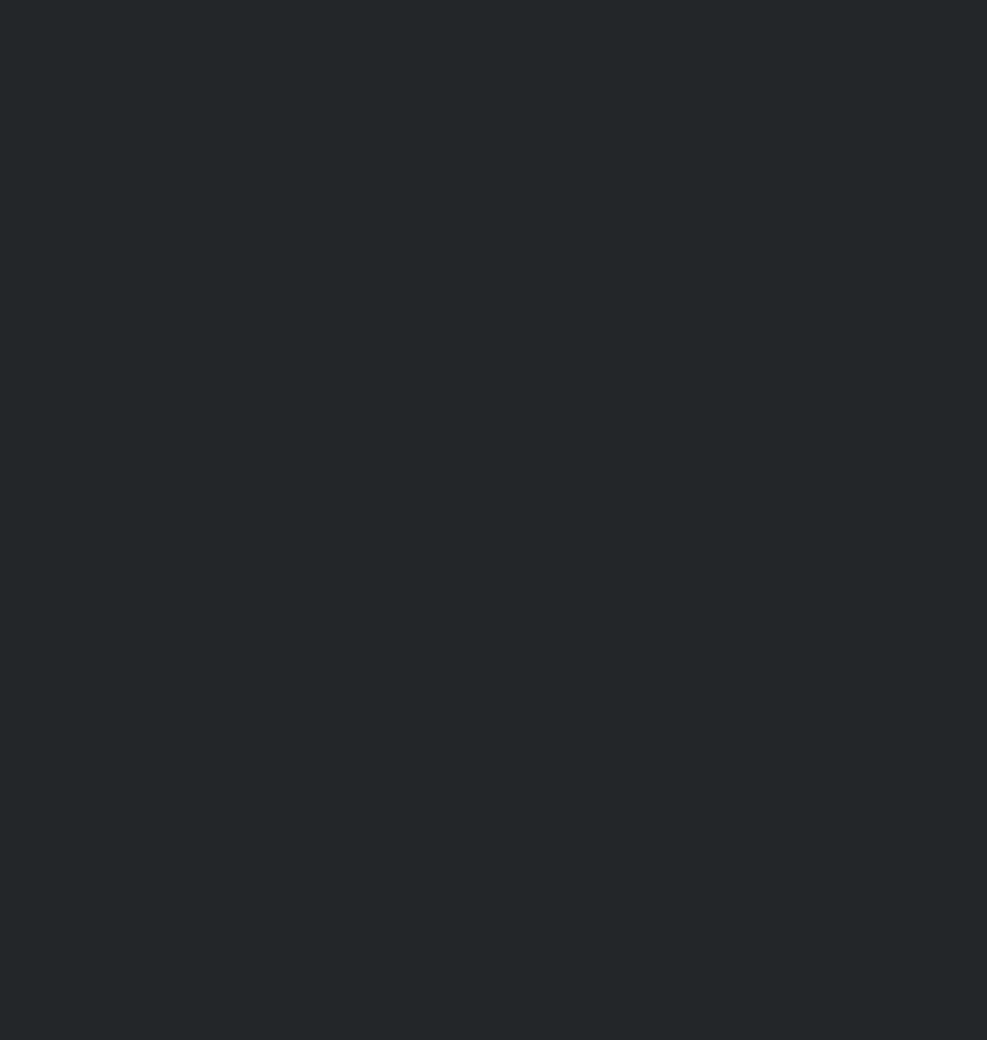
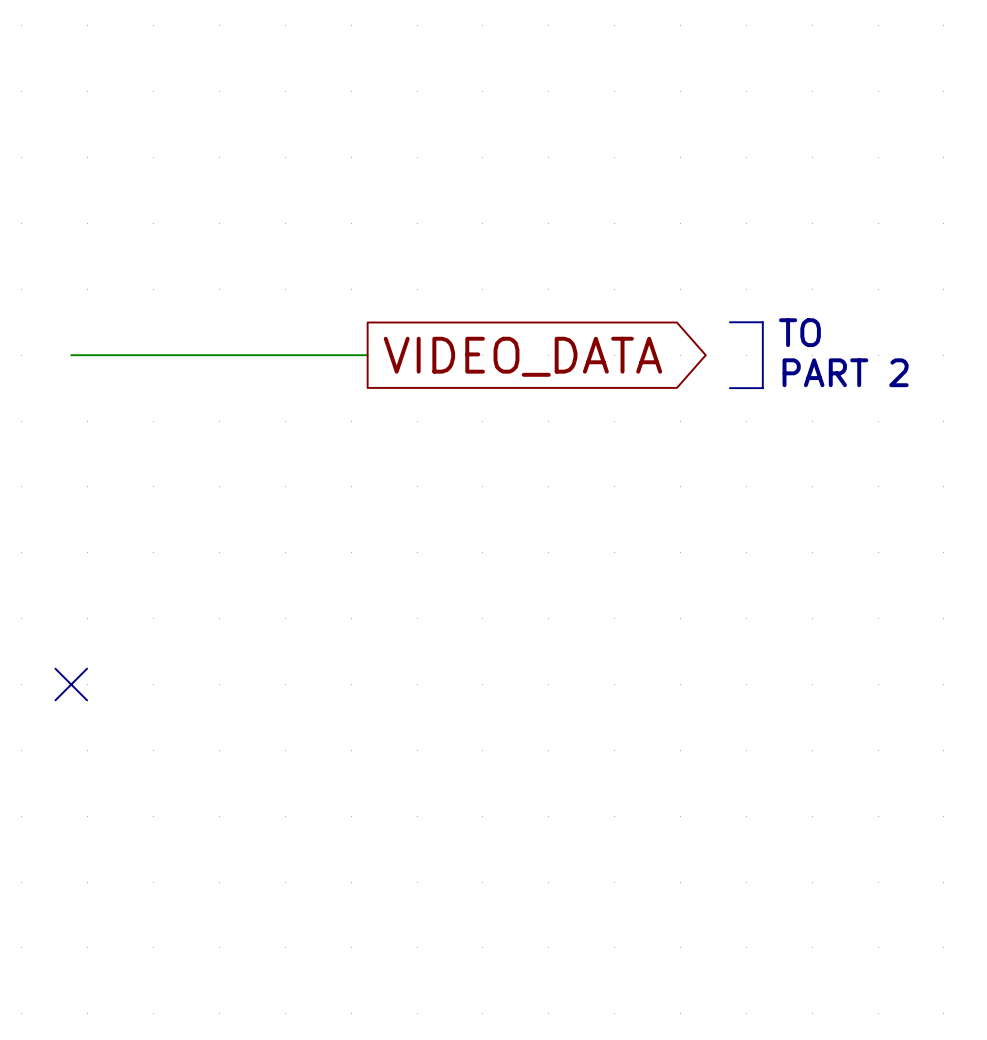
line: none -> (729, 322) (762, 322) (762, 388) (729, 388)
text: none -> TO (799, 332)
wire: none -> (71, 355) (367, 355)
global label: none -> VIDEO_DATA (522, 356)
text: none -> PART 2 (845, 372)
no-connect mark: none -> (71, 684)

